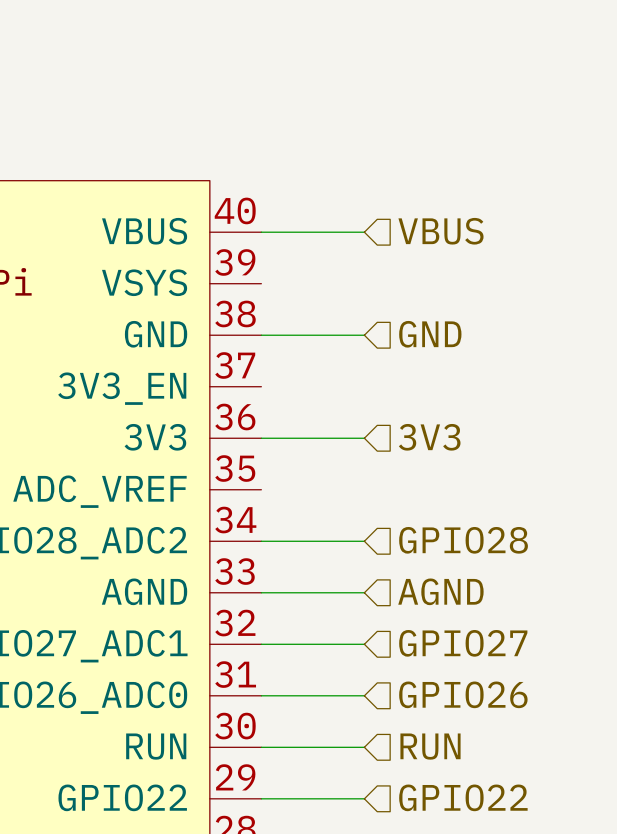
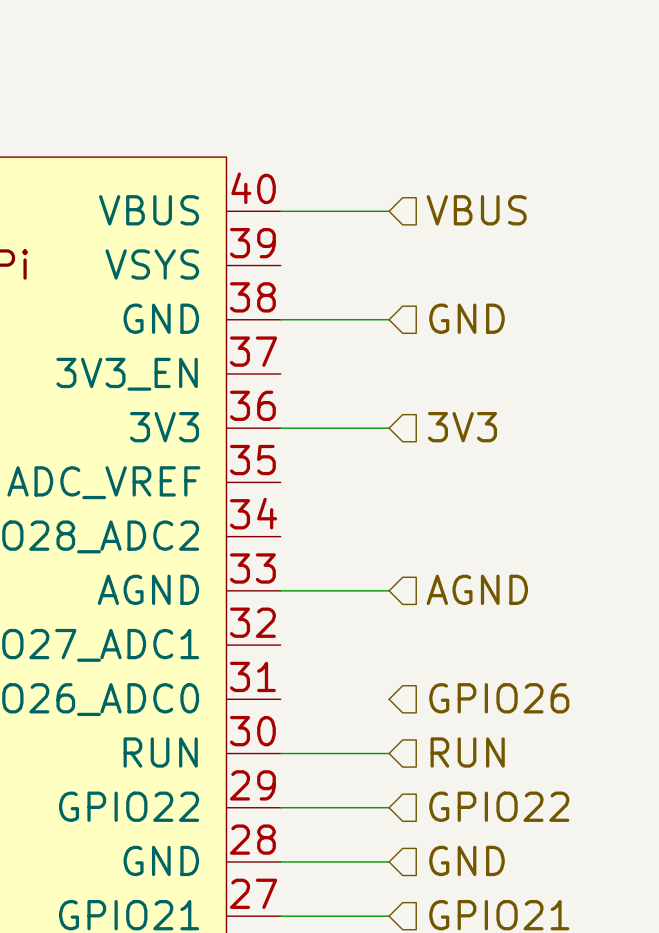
hierarchical label: GPIO28 (463, 540) -> none
wire: (261, 541) (364, 541) -> none
hierarchical label: GPIO27 (463, 643) -> none
wire: (261, 644) (364, 644) -> none
wire: (261, 695) (364, 695) -> none

